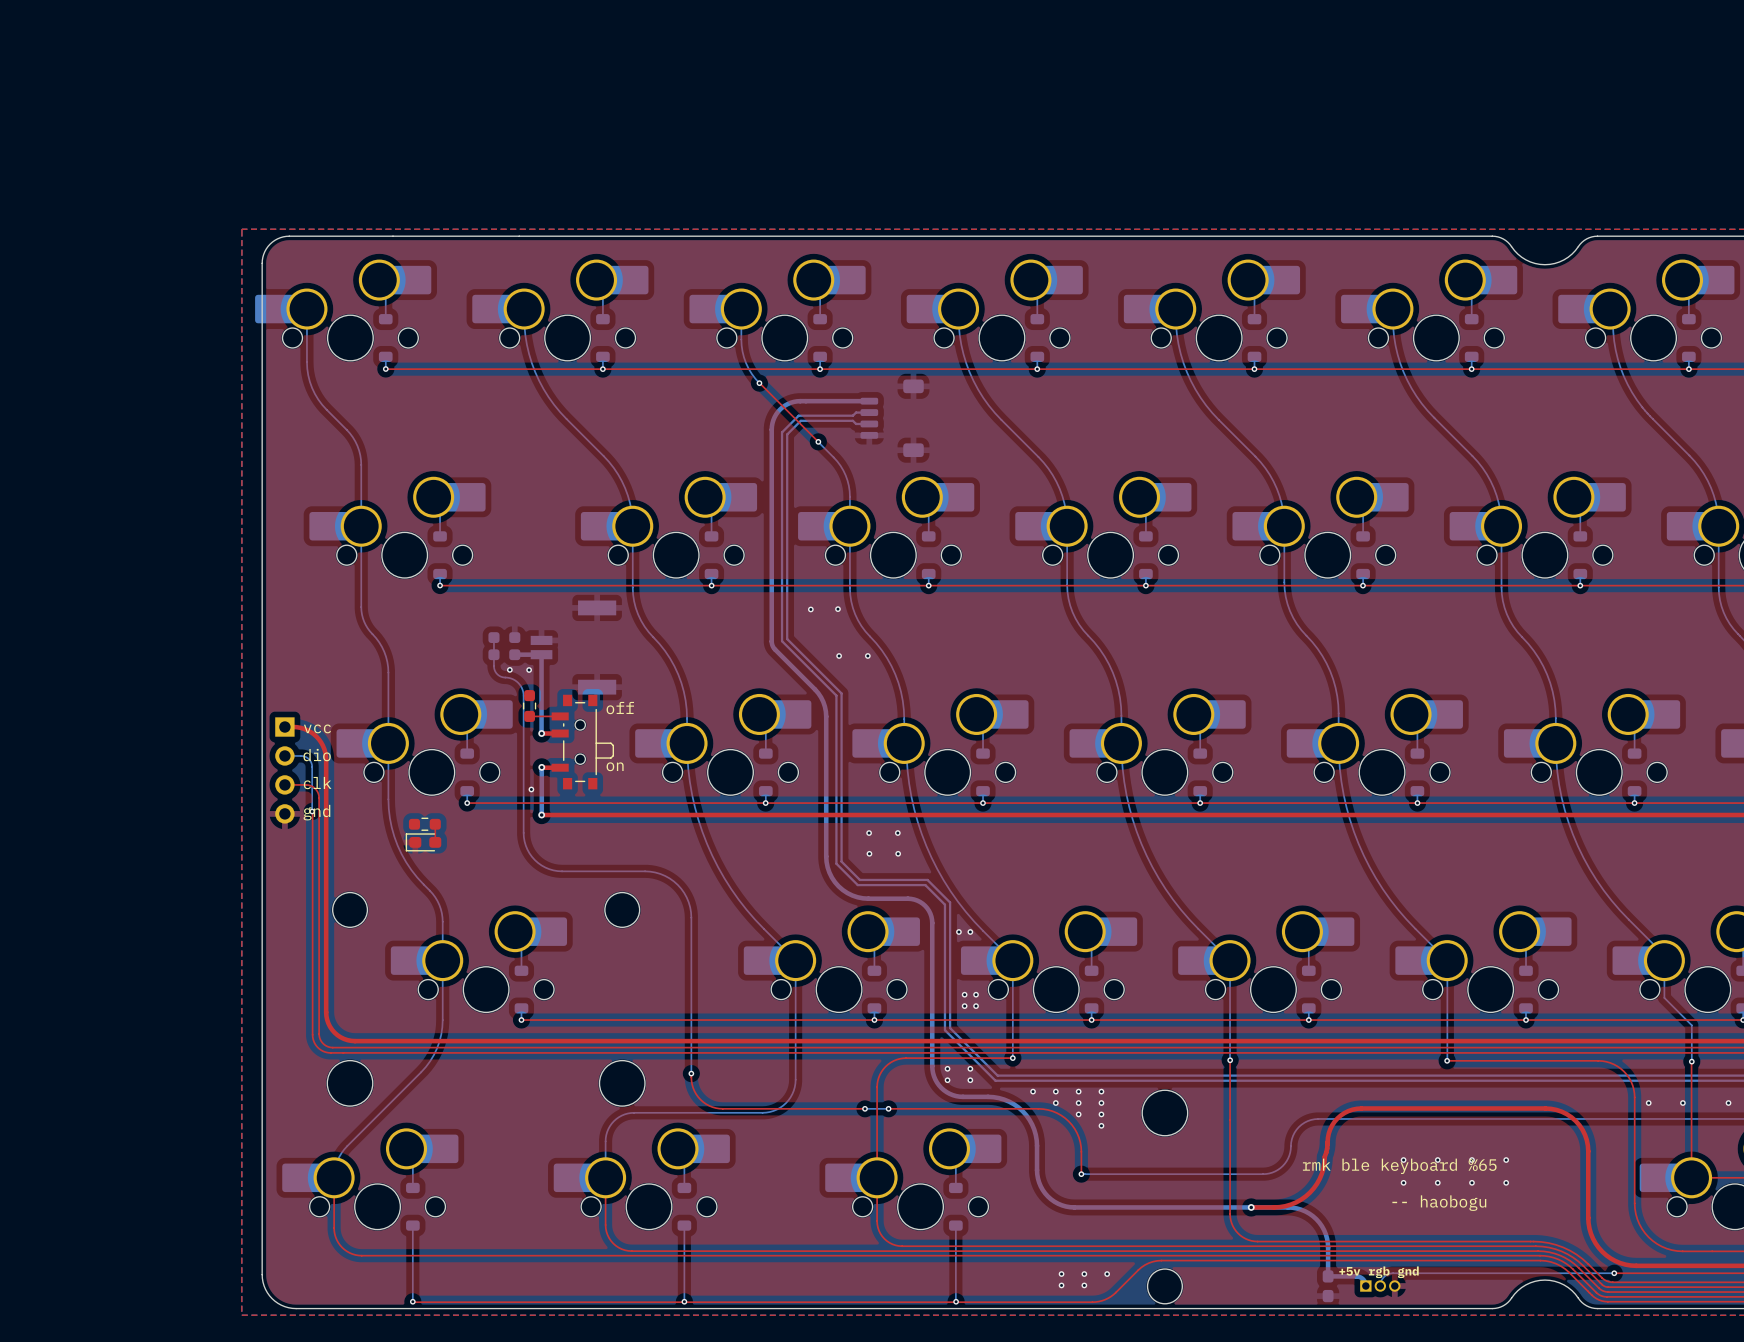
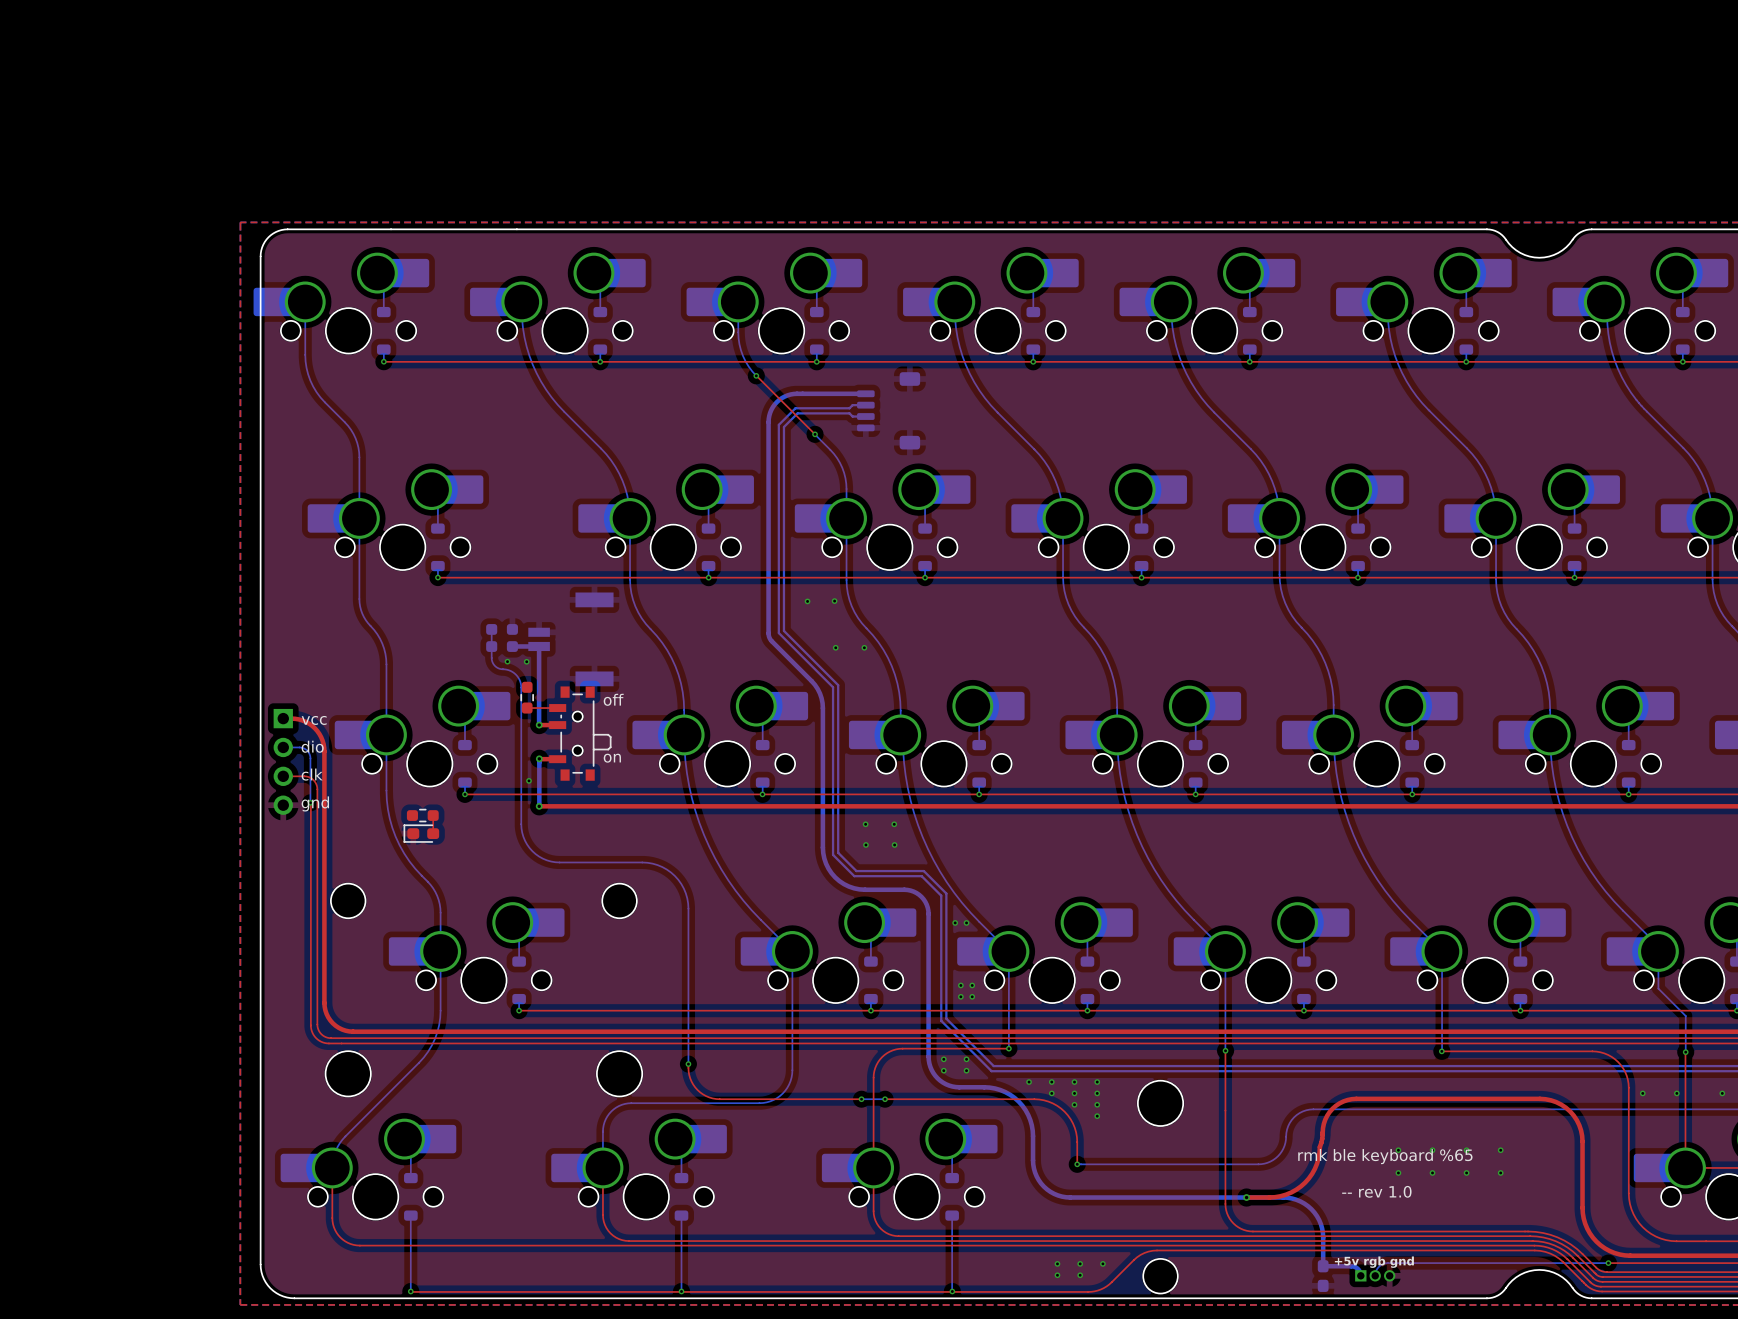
text: -- haobogu (1439, 1203) -> -- rev 1.0 (1376, 1191)

